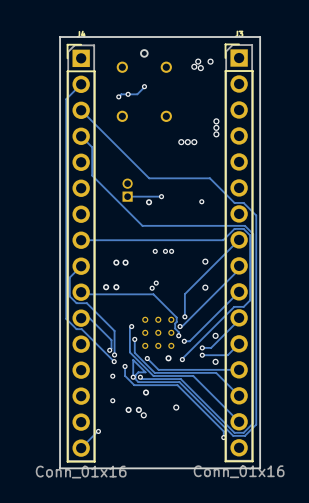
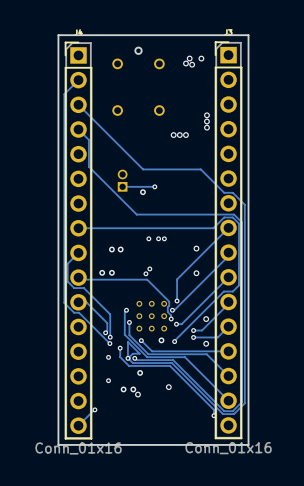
via: (144, 86) -> none
track: (144, 87) (137, 94) (121, 94) (118, 96) -> none
via: (128, 94) -> none
via: (118, 96) -> none
via: (201, 201) -> none

